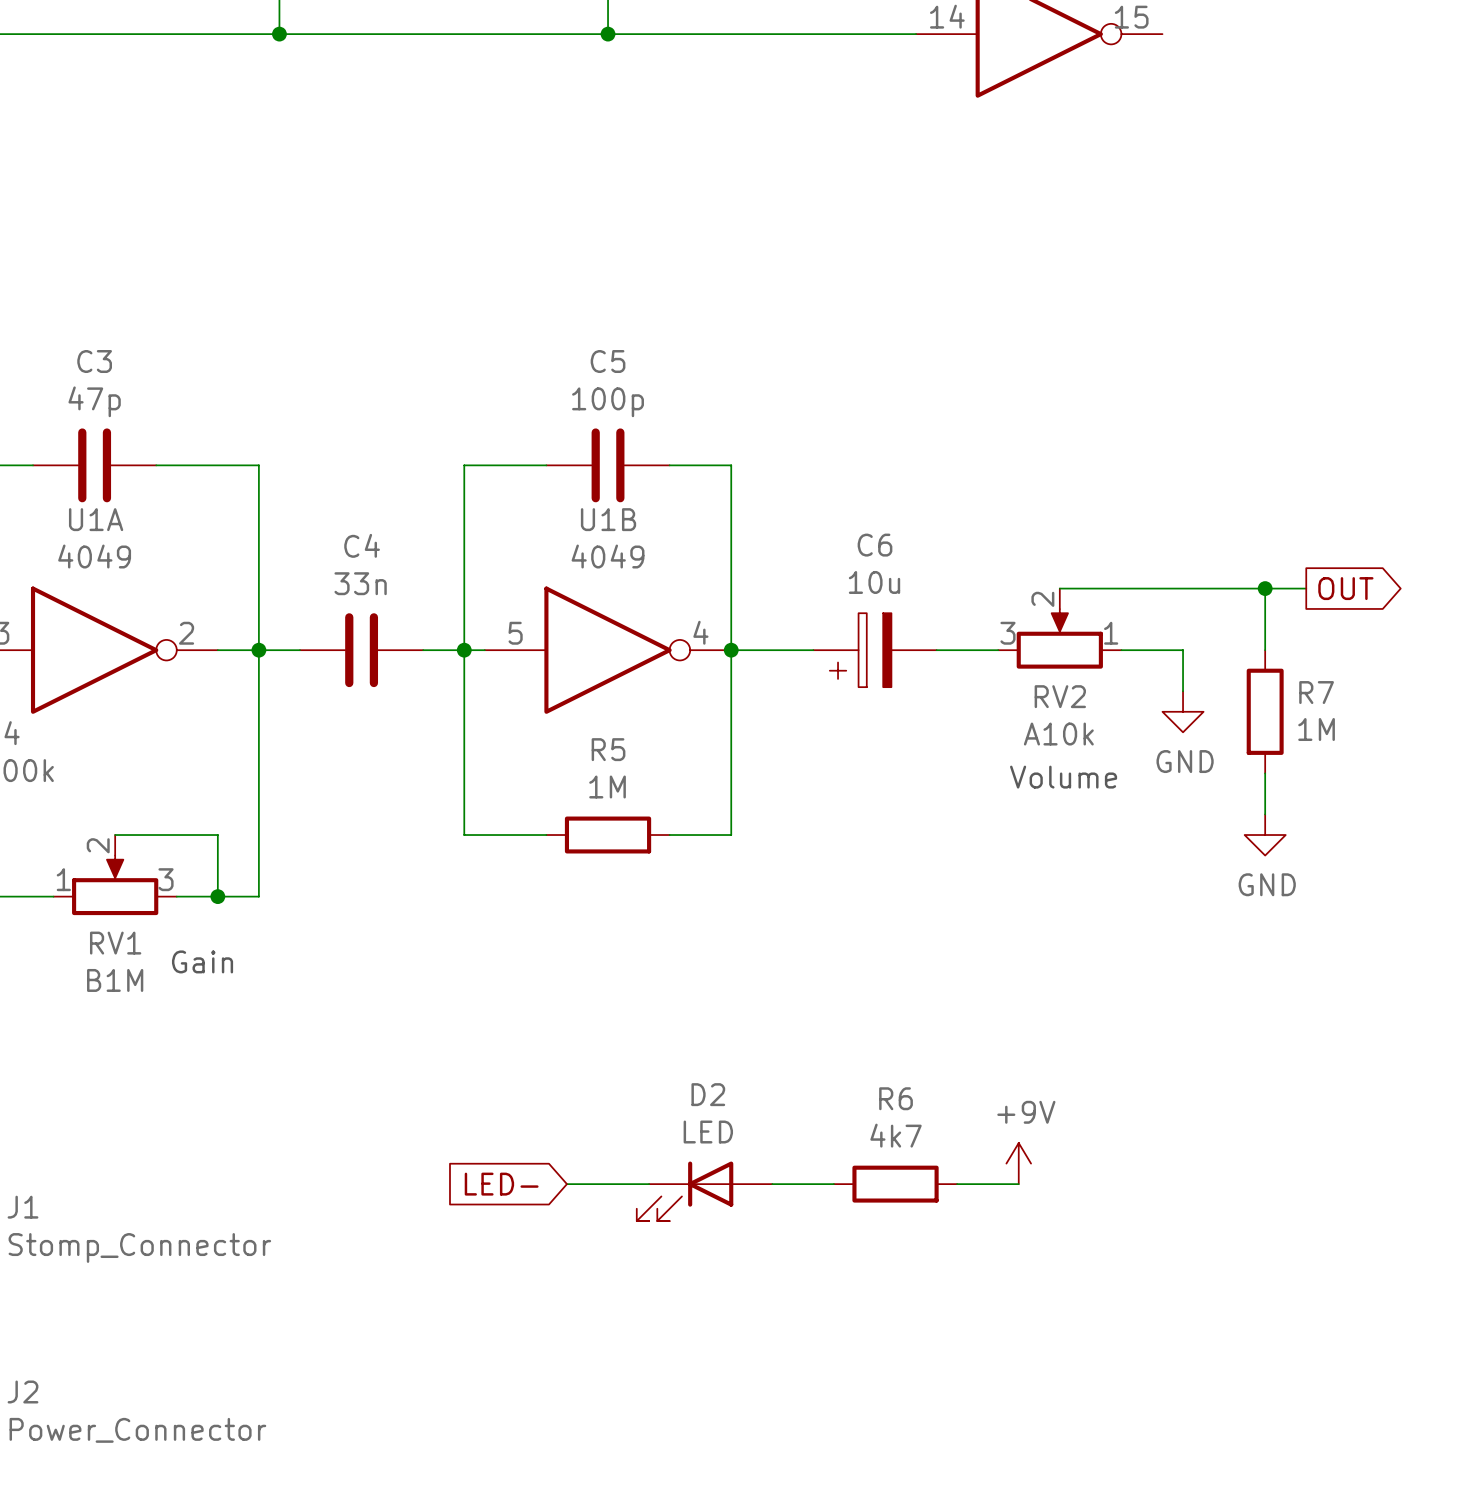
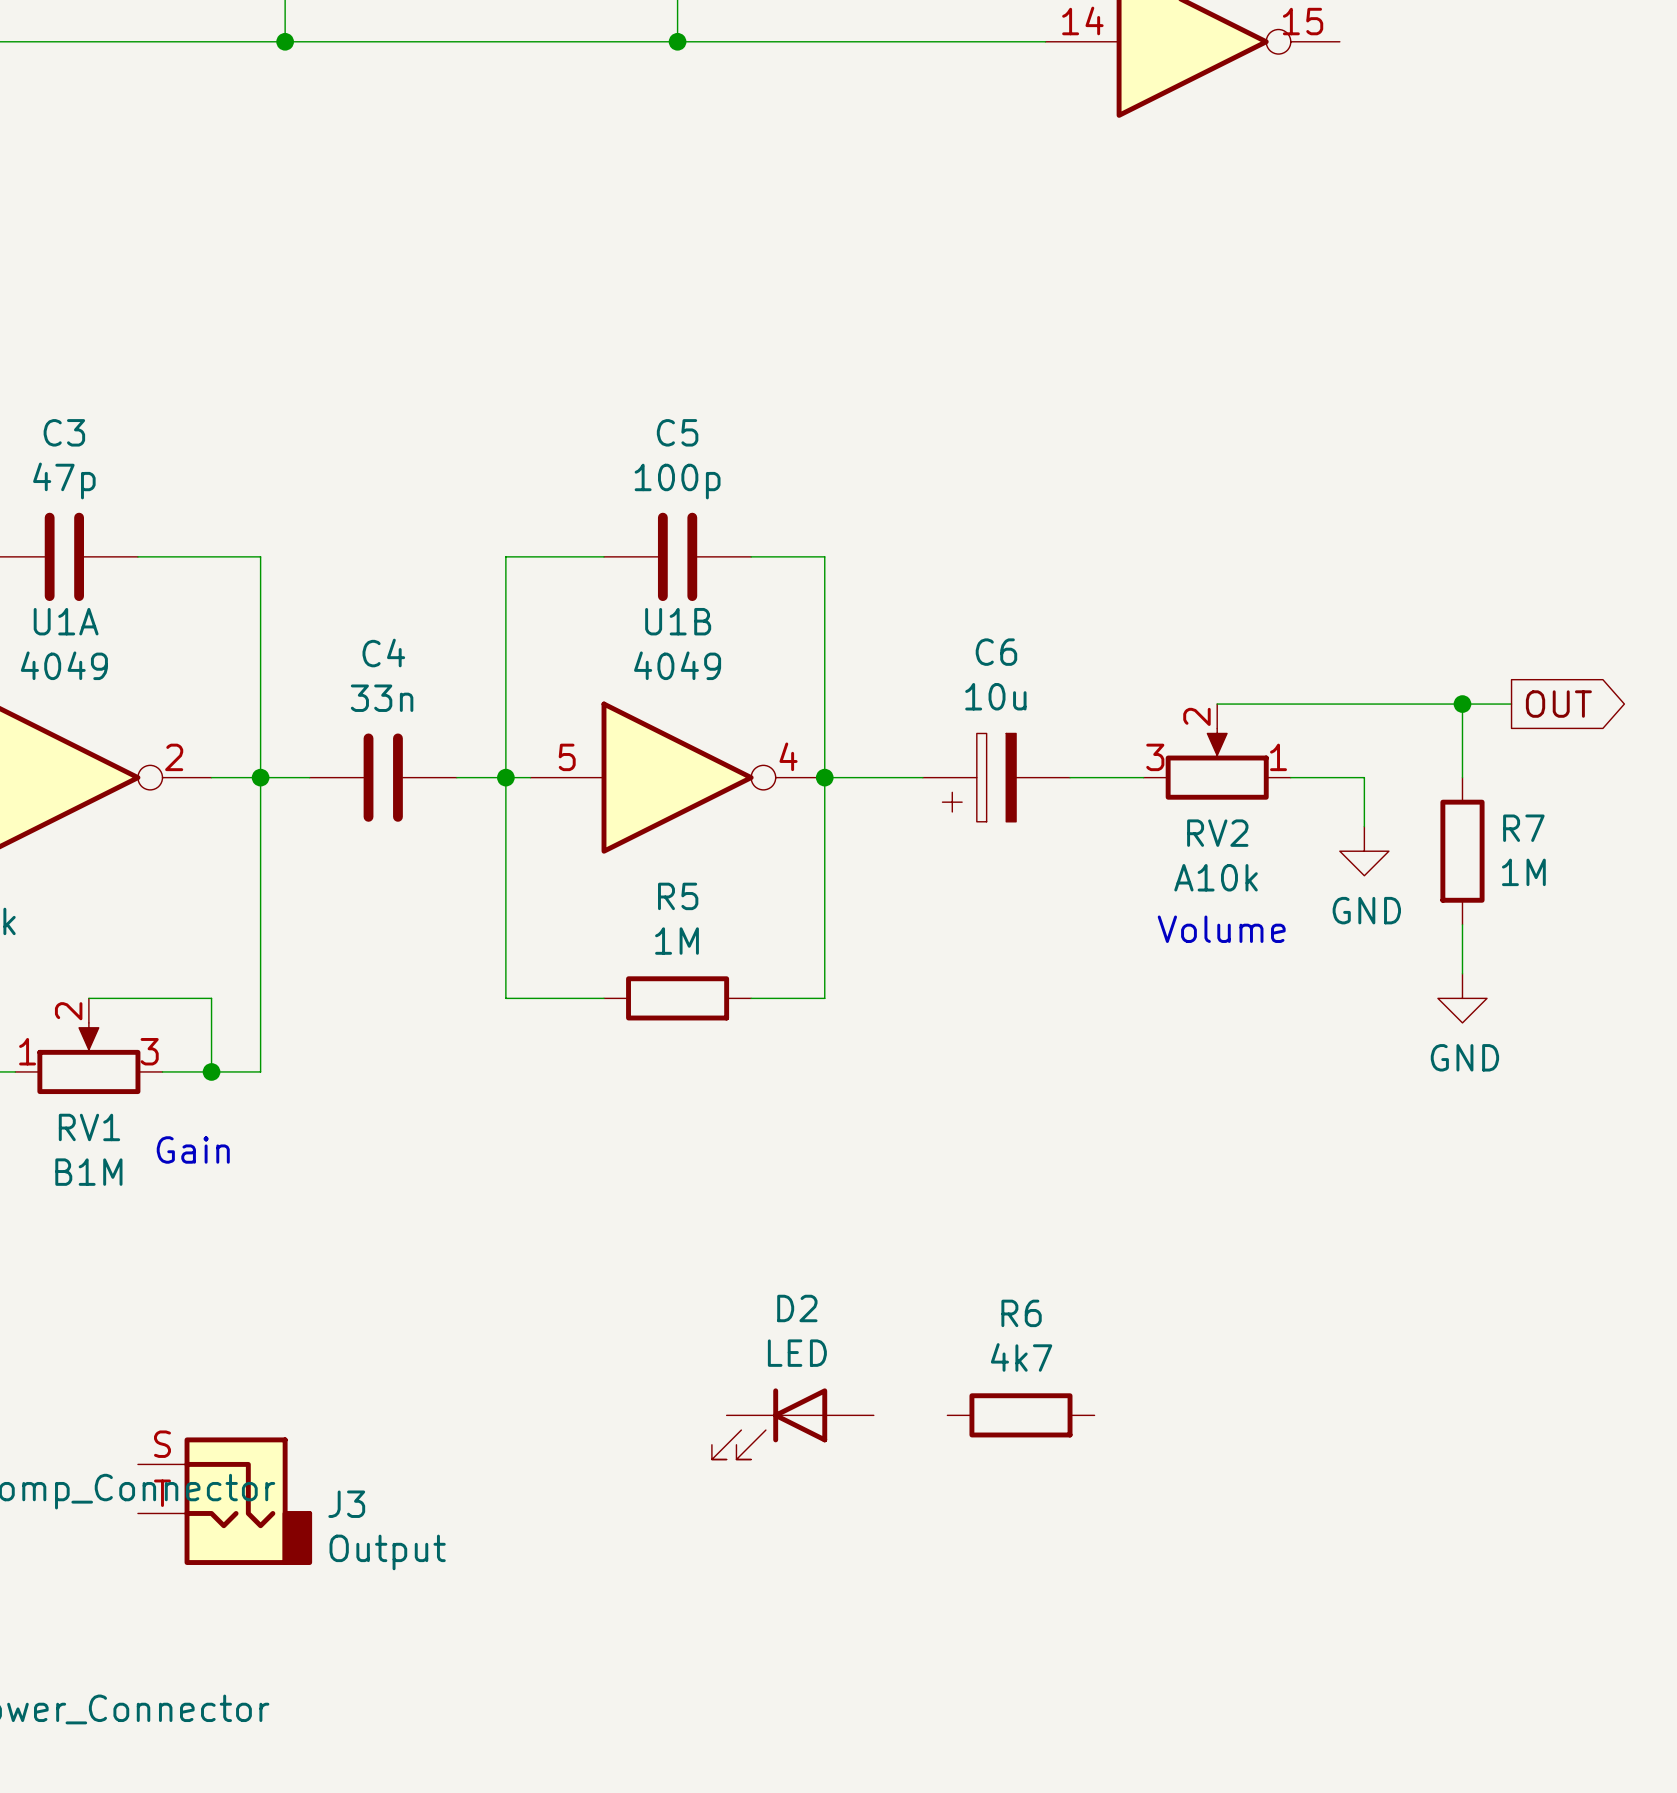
power symbol: +9V (1018, 1163) -> none
global label: LED- (501, 1184) -> none
wire: (566, 1184) (649, 1184) -> none
wire: (772, 1184) (833, 1184) -> none
wire: (957, 1184) (1018, 1184) -> none
J3: none -> Output (225, 1501)

